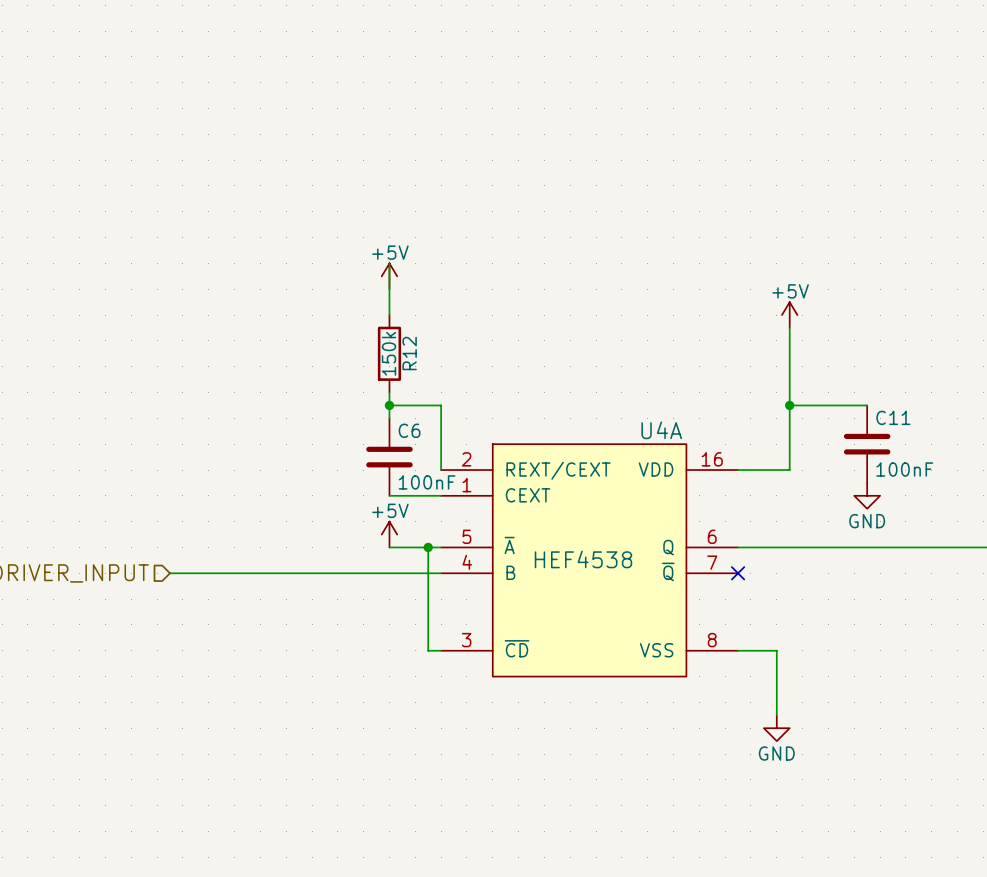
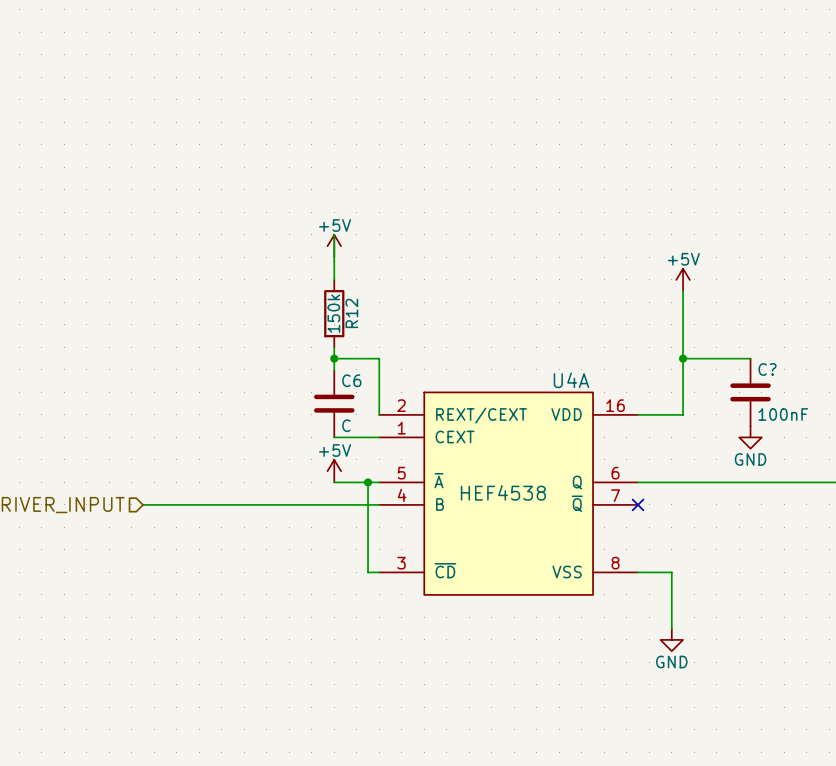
C11 name: C11 (893, 417) -> C? (767, 369)
C6 value: 100nF (427, 482) -> C (346, 425)

